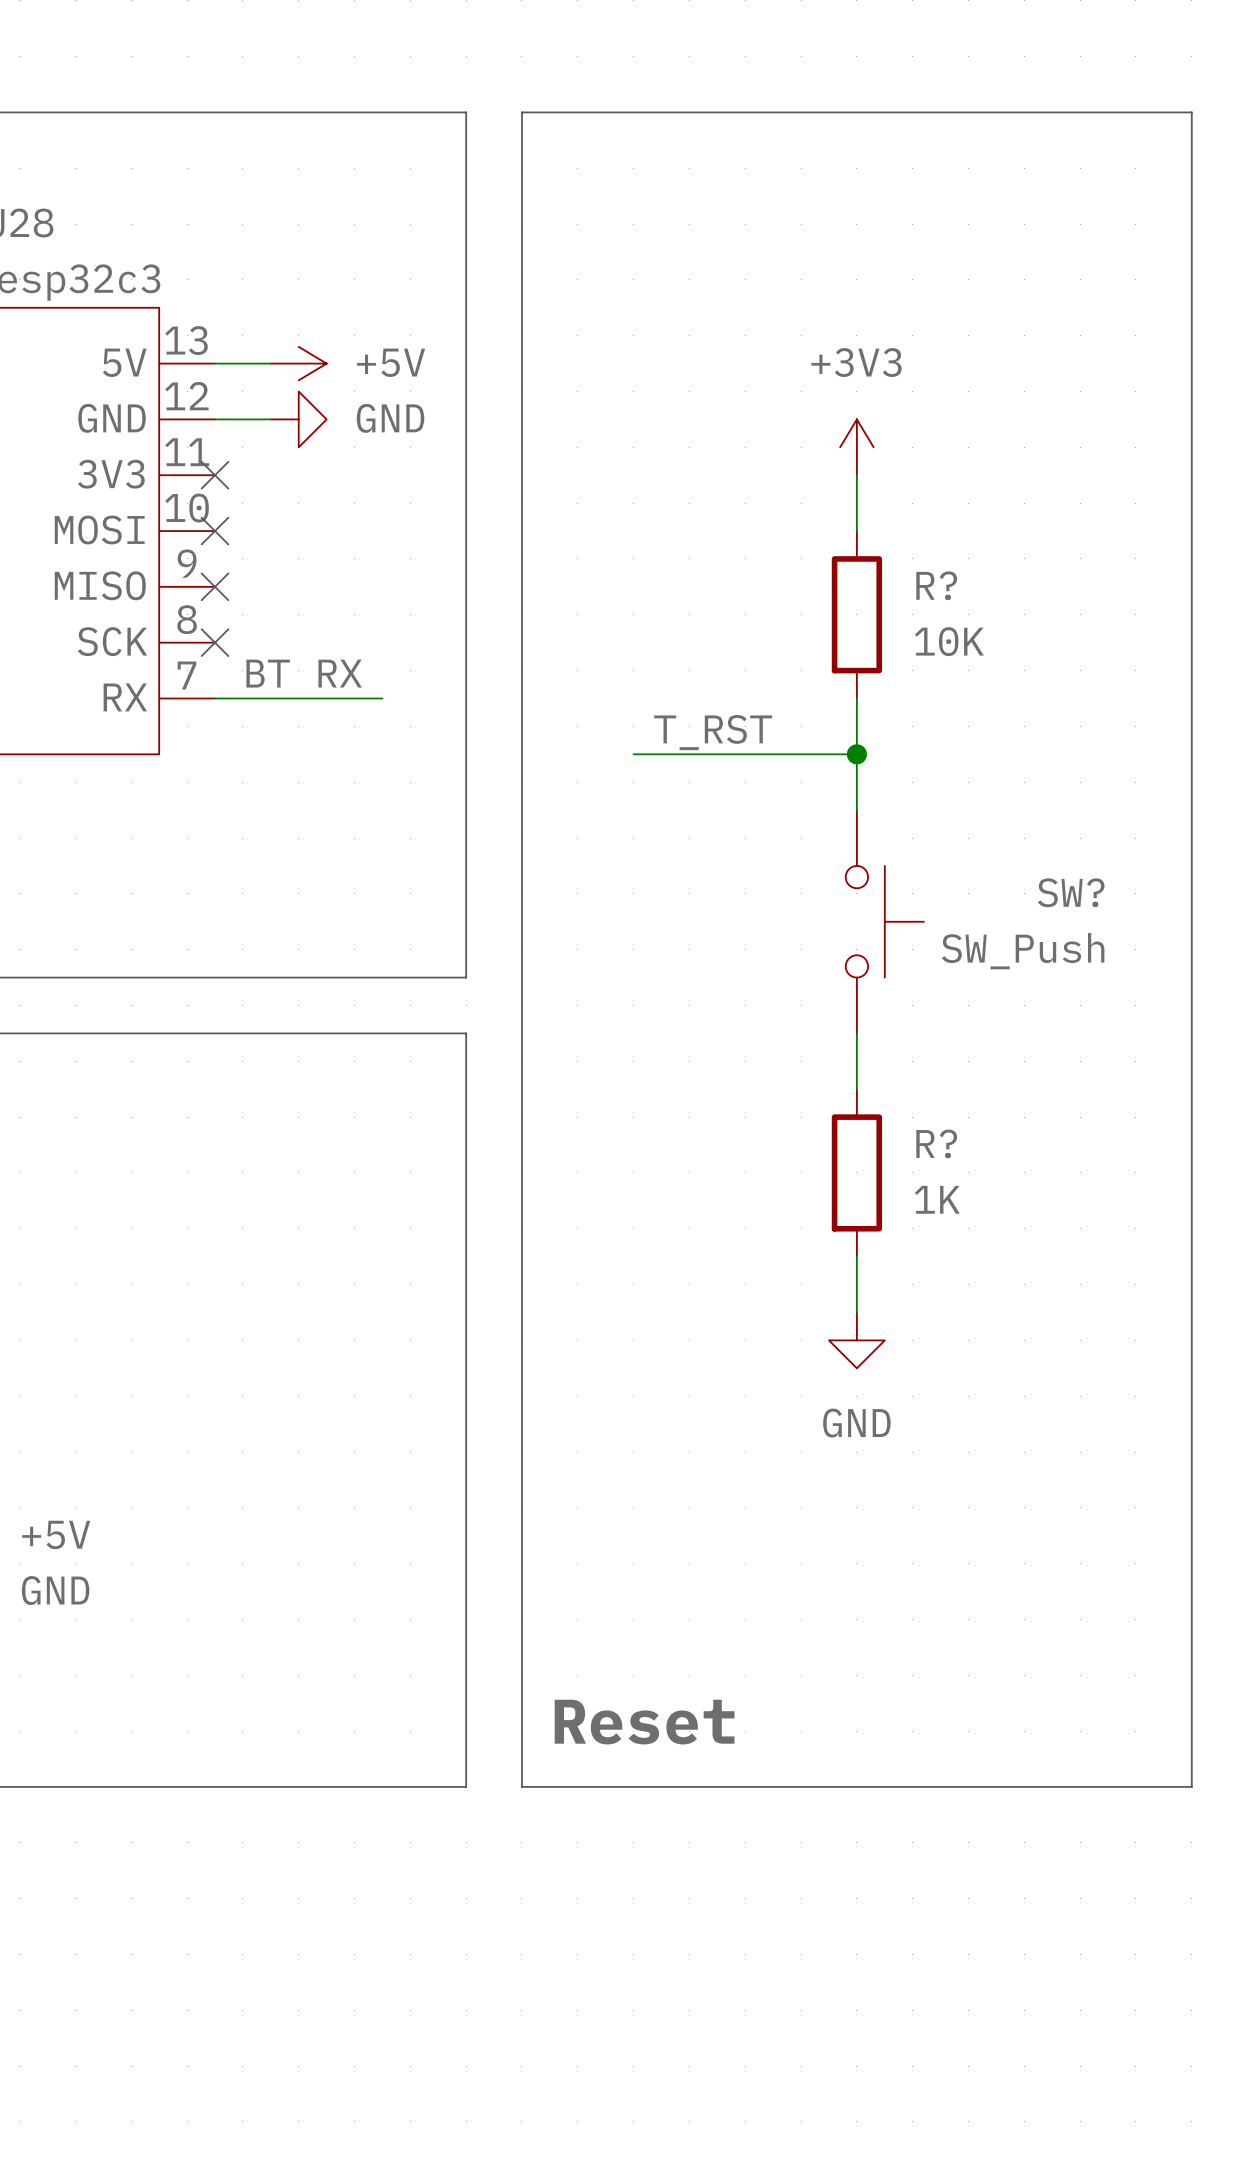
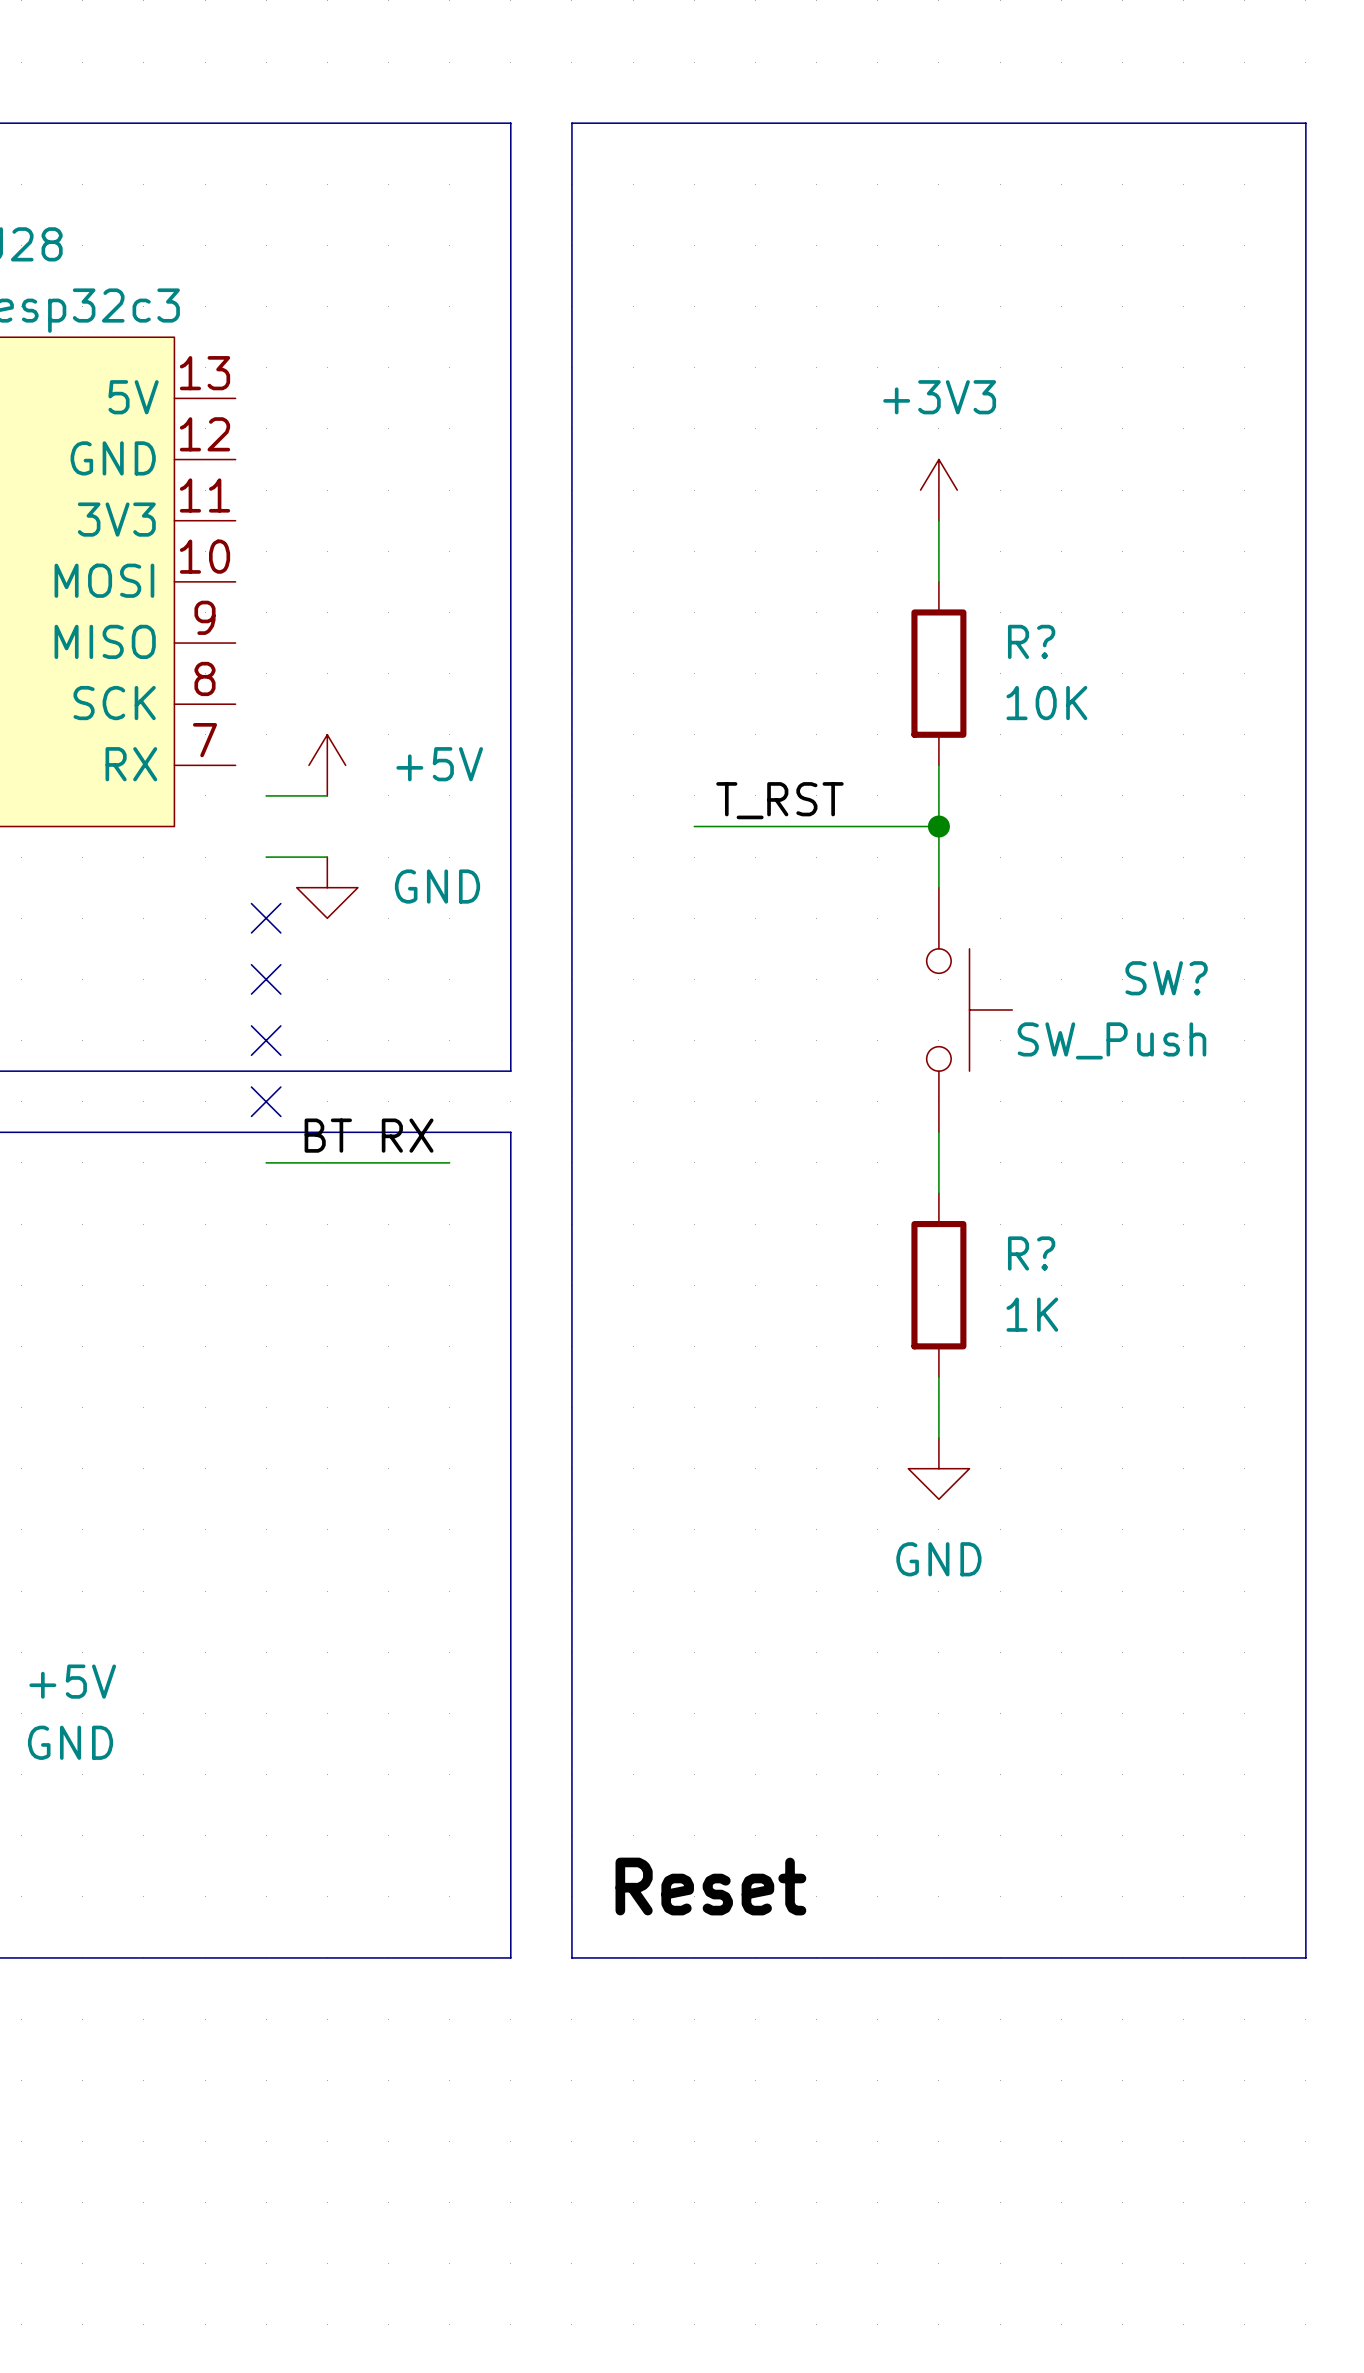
wire: (215, 363) (270, 363) -> (266, 795) (327, 795)
power symbol rotation: 0° (298, 363) -> 90° counterclockwise (327, 765)
power symbol position: +5V (298, 363) -> +5V (327, 765)
wire: (215, 419) (270, 419) -> (266, 857) (327, 857)
power symbol rotation: 0° (298, 419) -> 90° clockwise (327, 887)
power symbol position: GND (298, 419) -> GND (327, 887)
no-connect mark: (215, 475) -> none
no-connect mark: (215, 531) -> none
no-connect mark: (215, 586) -> none
no-connect mark: (215, 642) -> none
label position: BT RX (304, 673) -> BT RX (369, 1135)
wire: (215, 698) (382, 698) -> (266, 1162) (449, 1162)
no-connect mark: none -> (266, 918)
no-connect mark: none -> (266, 979)
no-connect mark: none -> (266, 1040)
no-connect mark: none -> (266, 1101)

